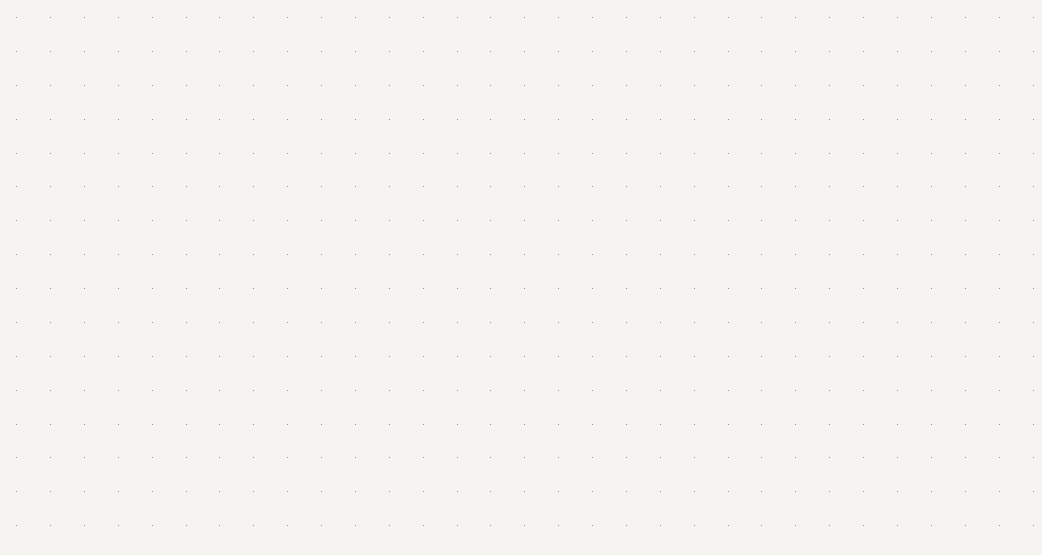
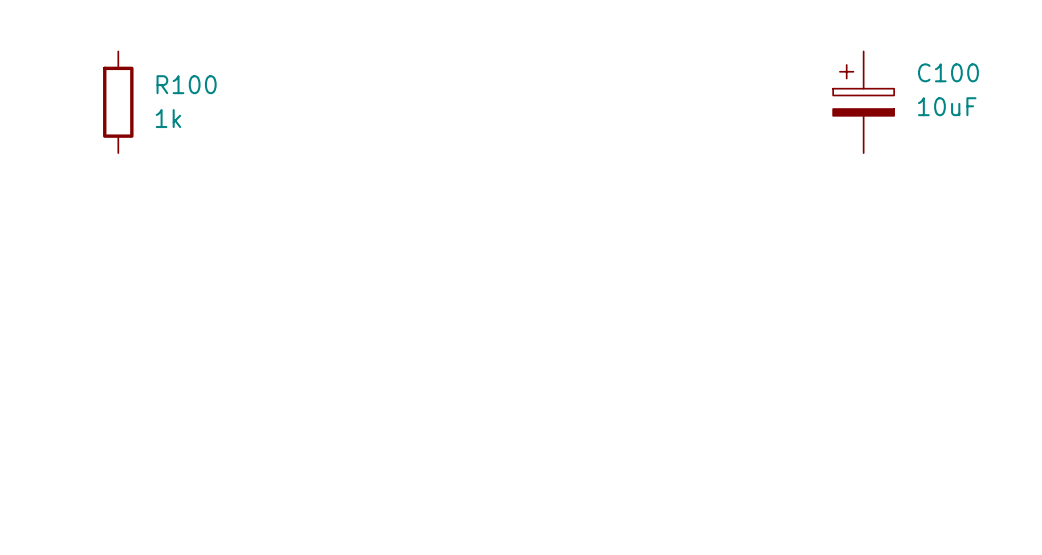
R100: none -> 1k (118, 102)
C100: none -> 10uF (863, 102)

